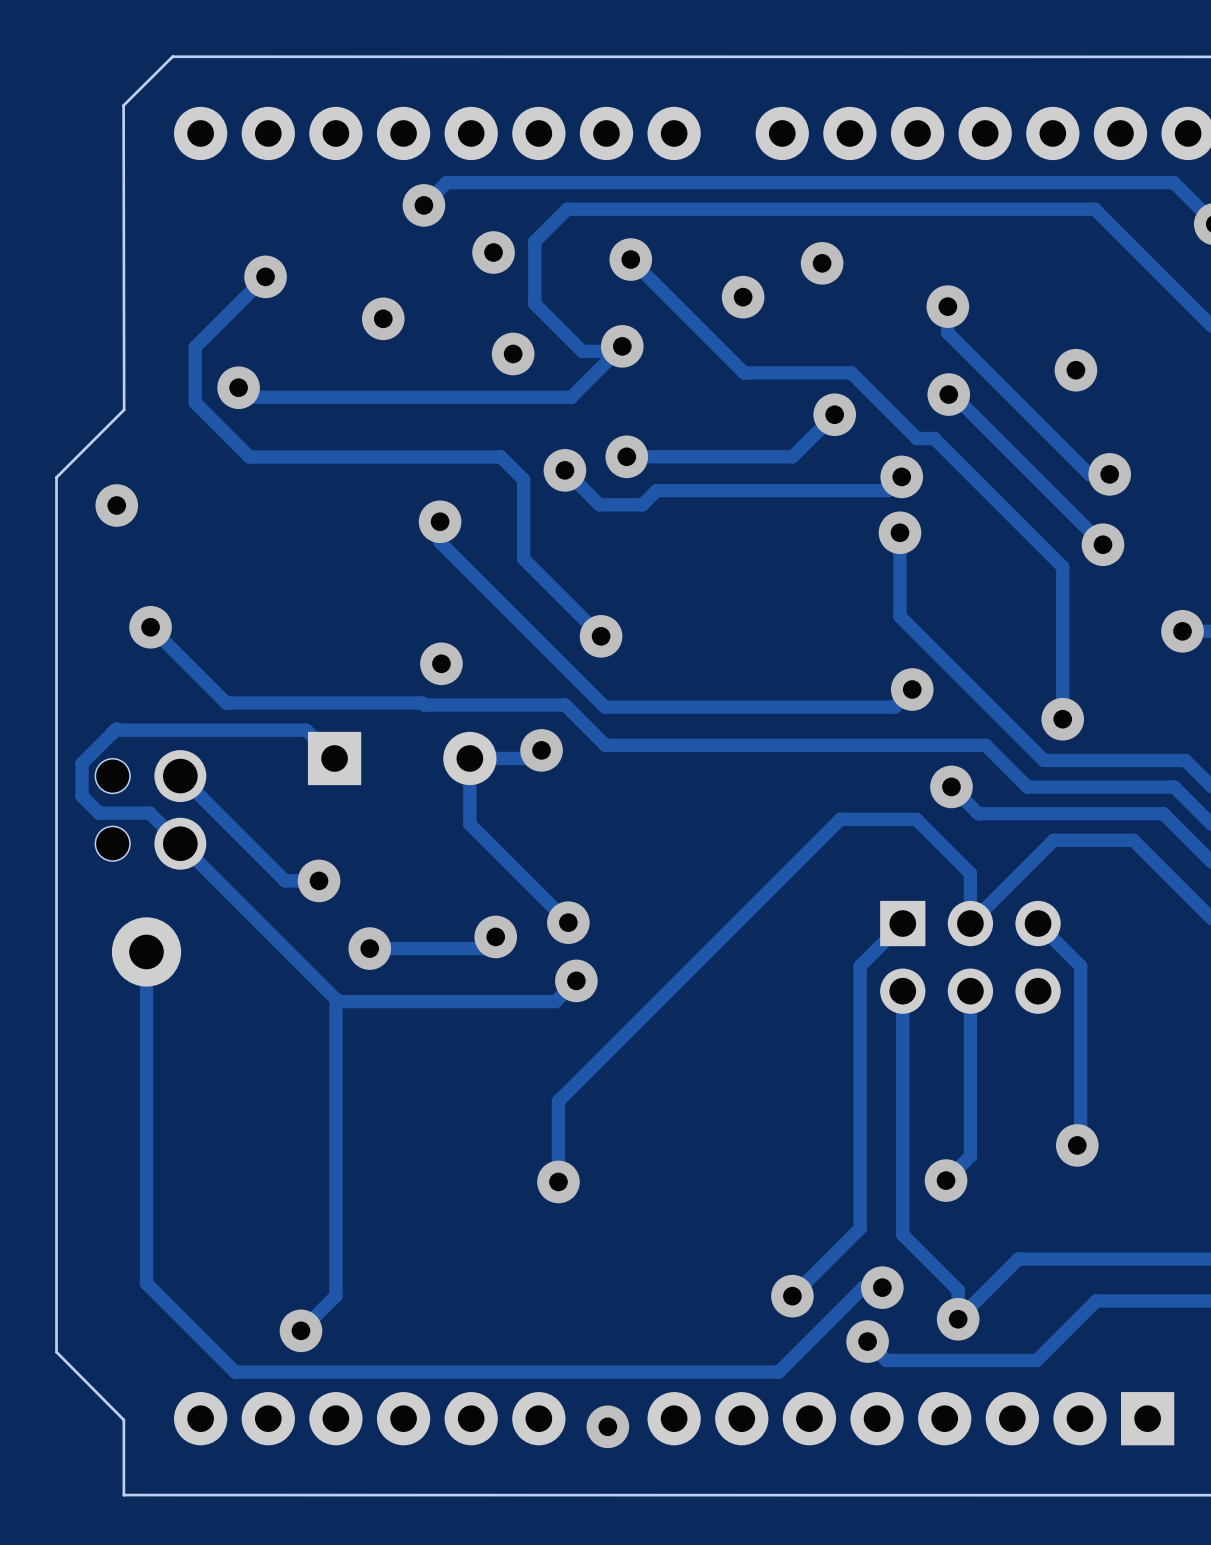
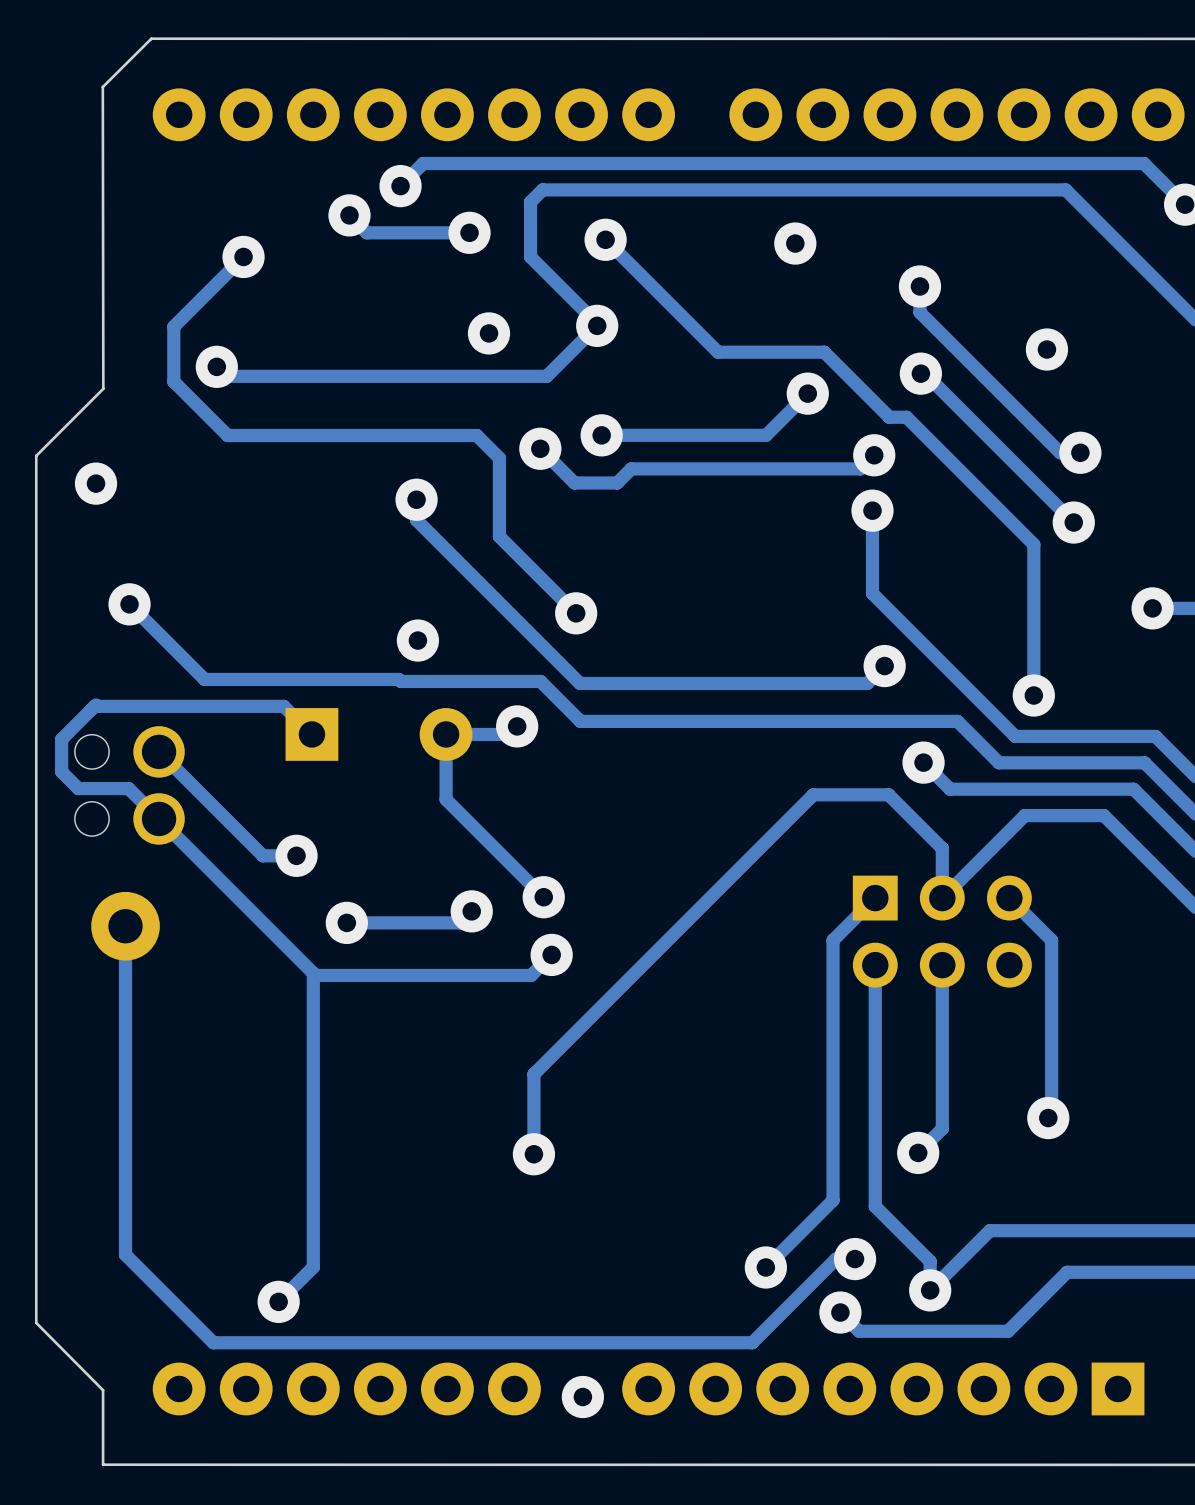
track: (555, 221) (534, 241) (534, 303) (582, 351) (629, 351) -> (530, 201) (530, 256) (604, 330)
track: none -> (349, 215) (366, 232) (472, 232)
via: (743, 297) -> none
via position: (383, 318) -> (349, 215)

